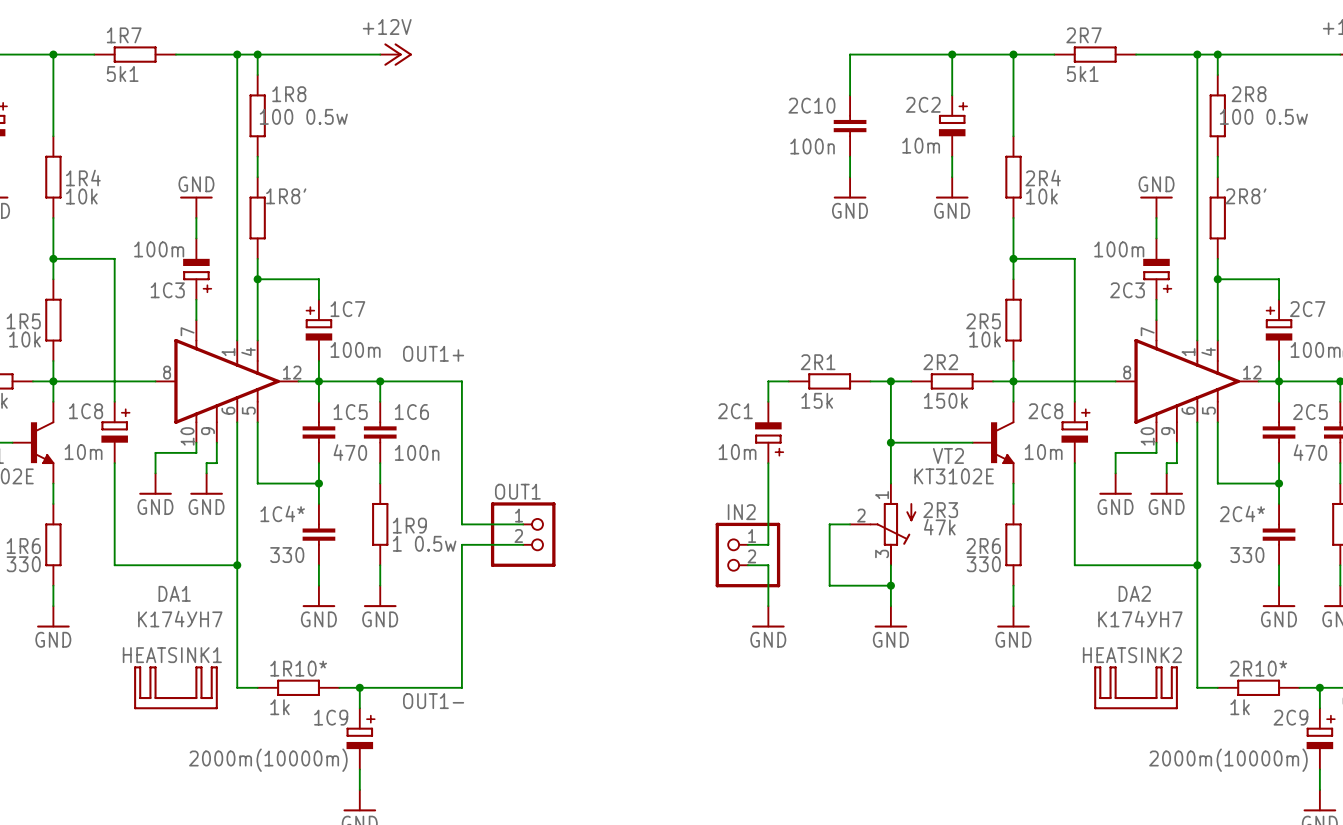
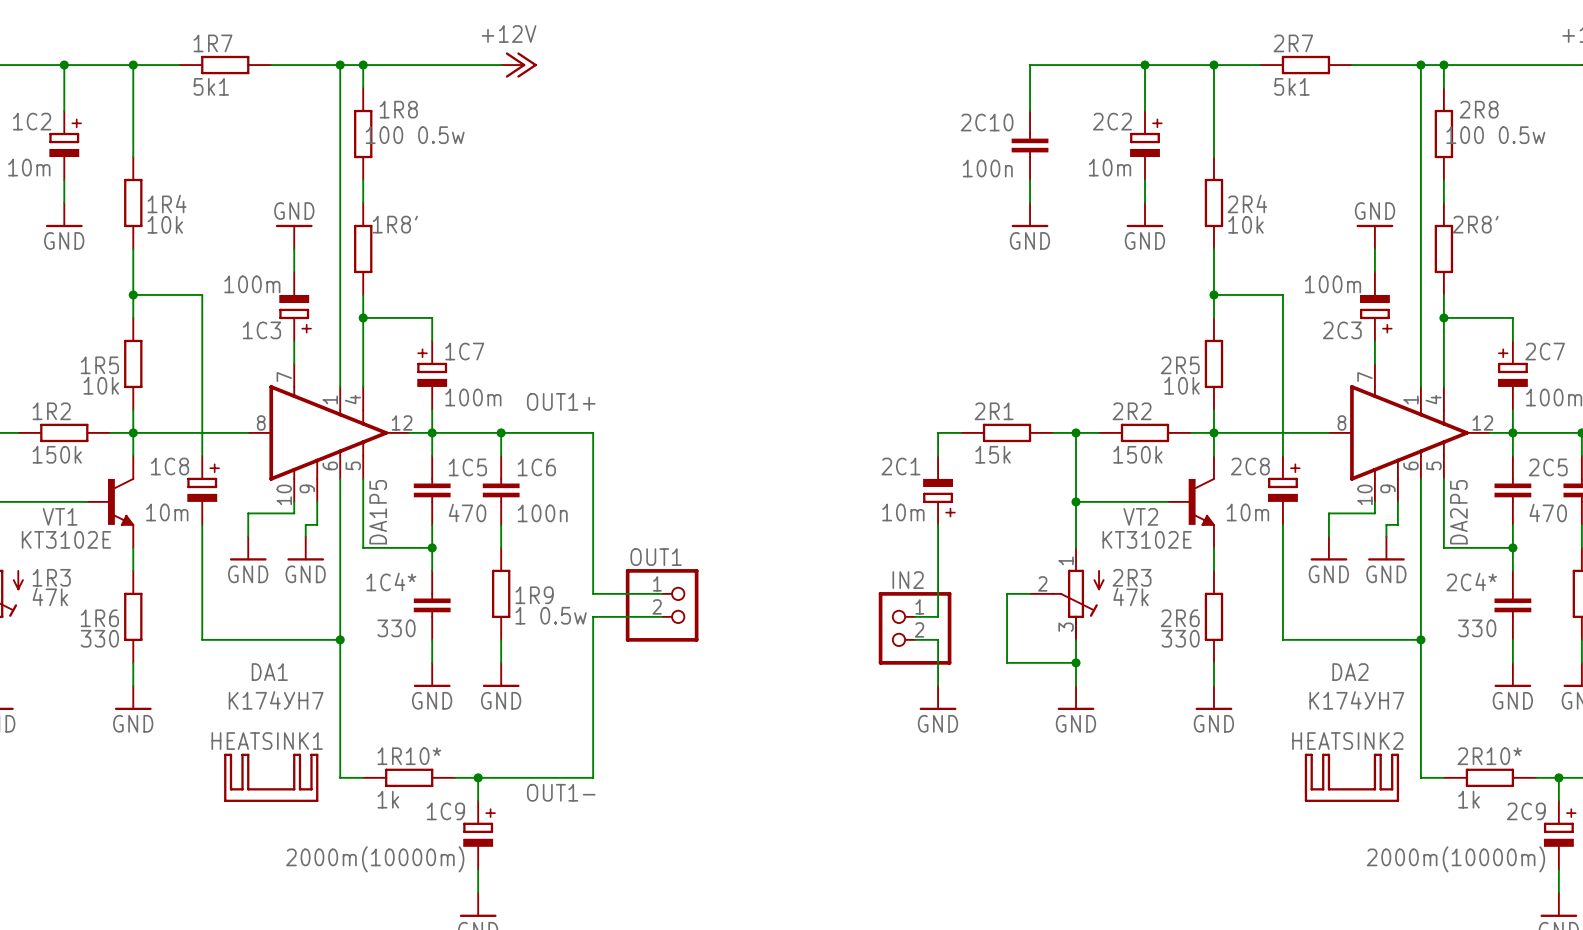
label: none -> DA1P5 (378, 512)
label: none -> DA2P5 (1458, 512)

